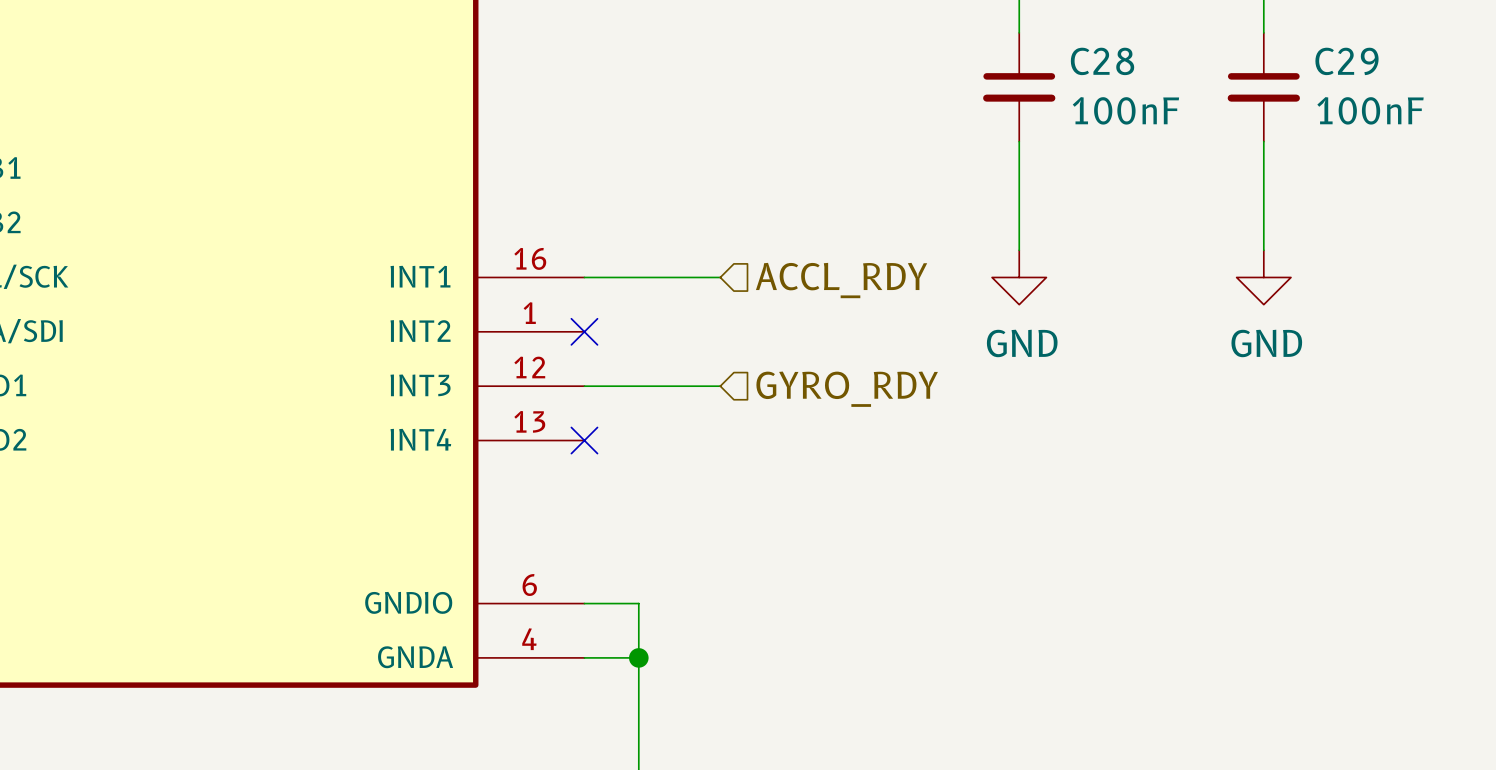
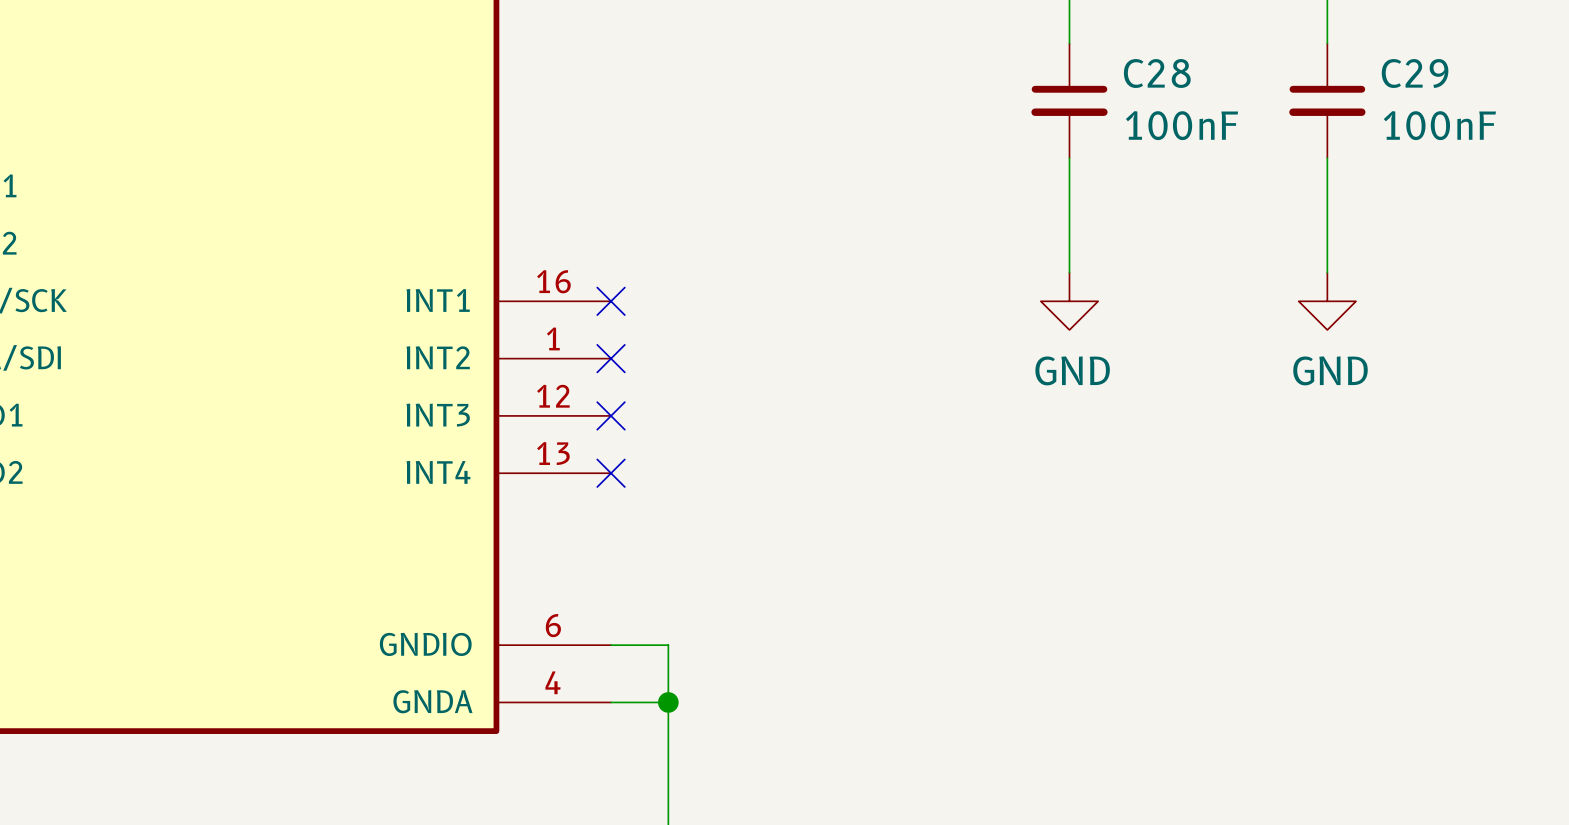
wire: (584, 277) (720, 277) -> none
no-connect mark: none -> (611, 301)
hierarchical label: ACCL_RDY (841, 280) -> none
wire: (584, 386) (720, 386) -> none
no-connect mark: none -> (611, 415)
hierarchical label: GYRO_RDY (847, 389) -> none

